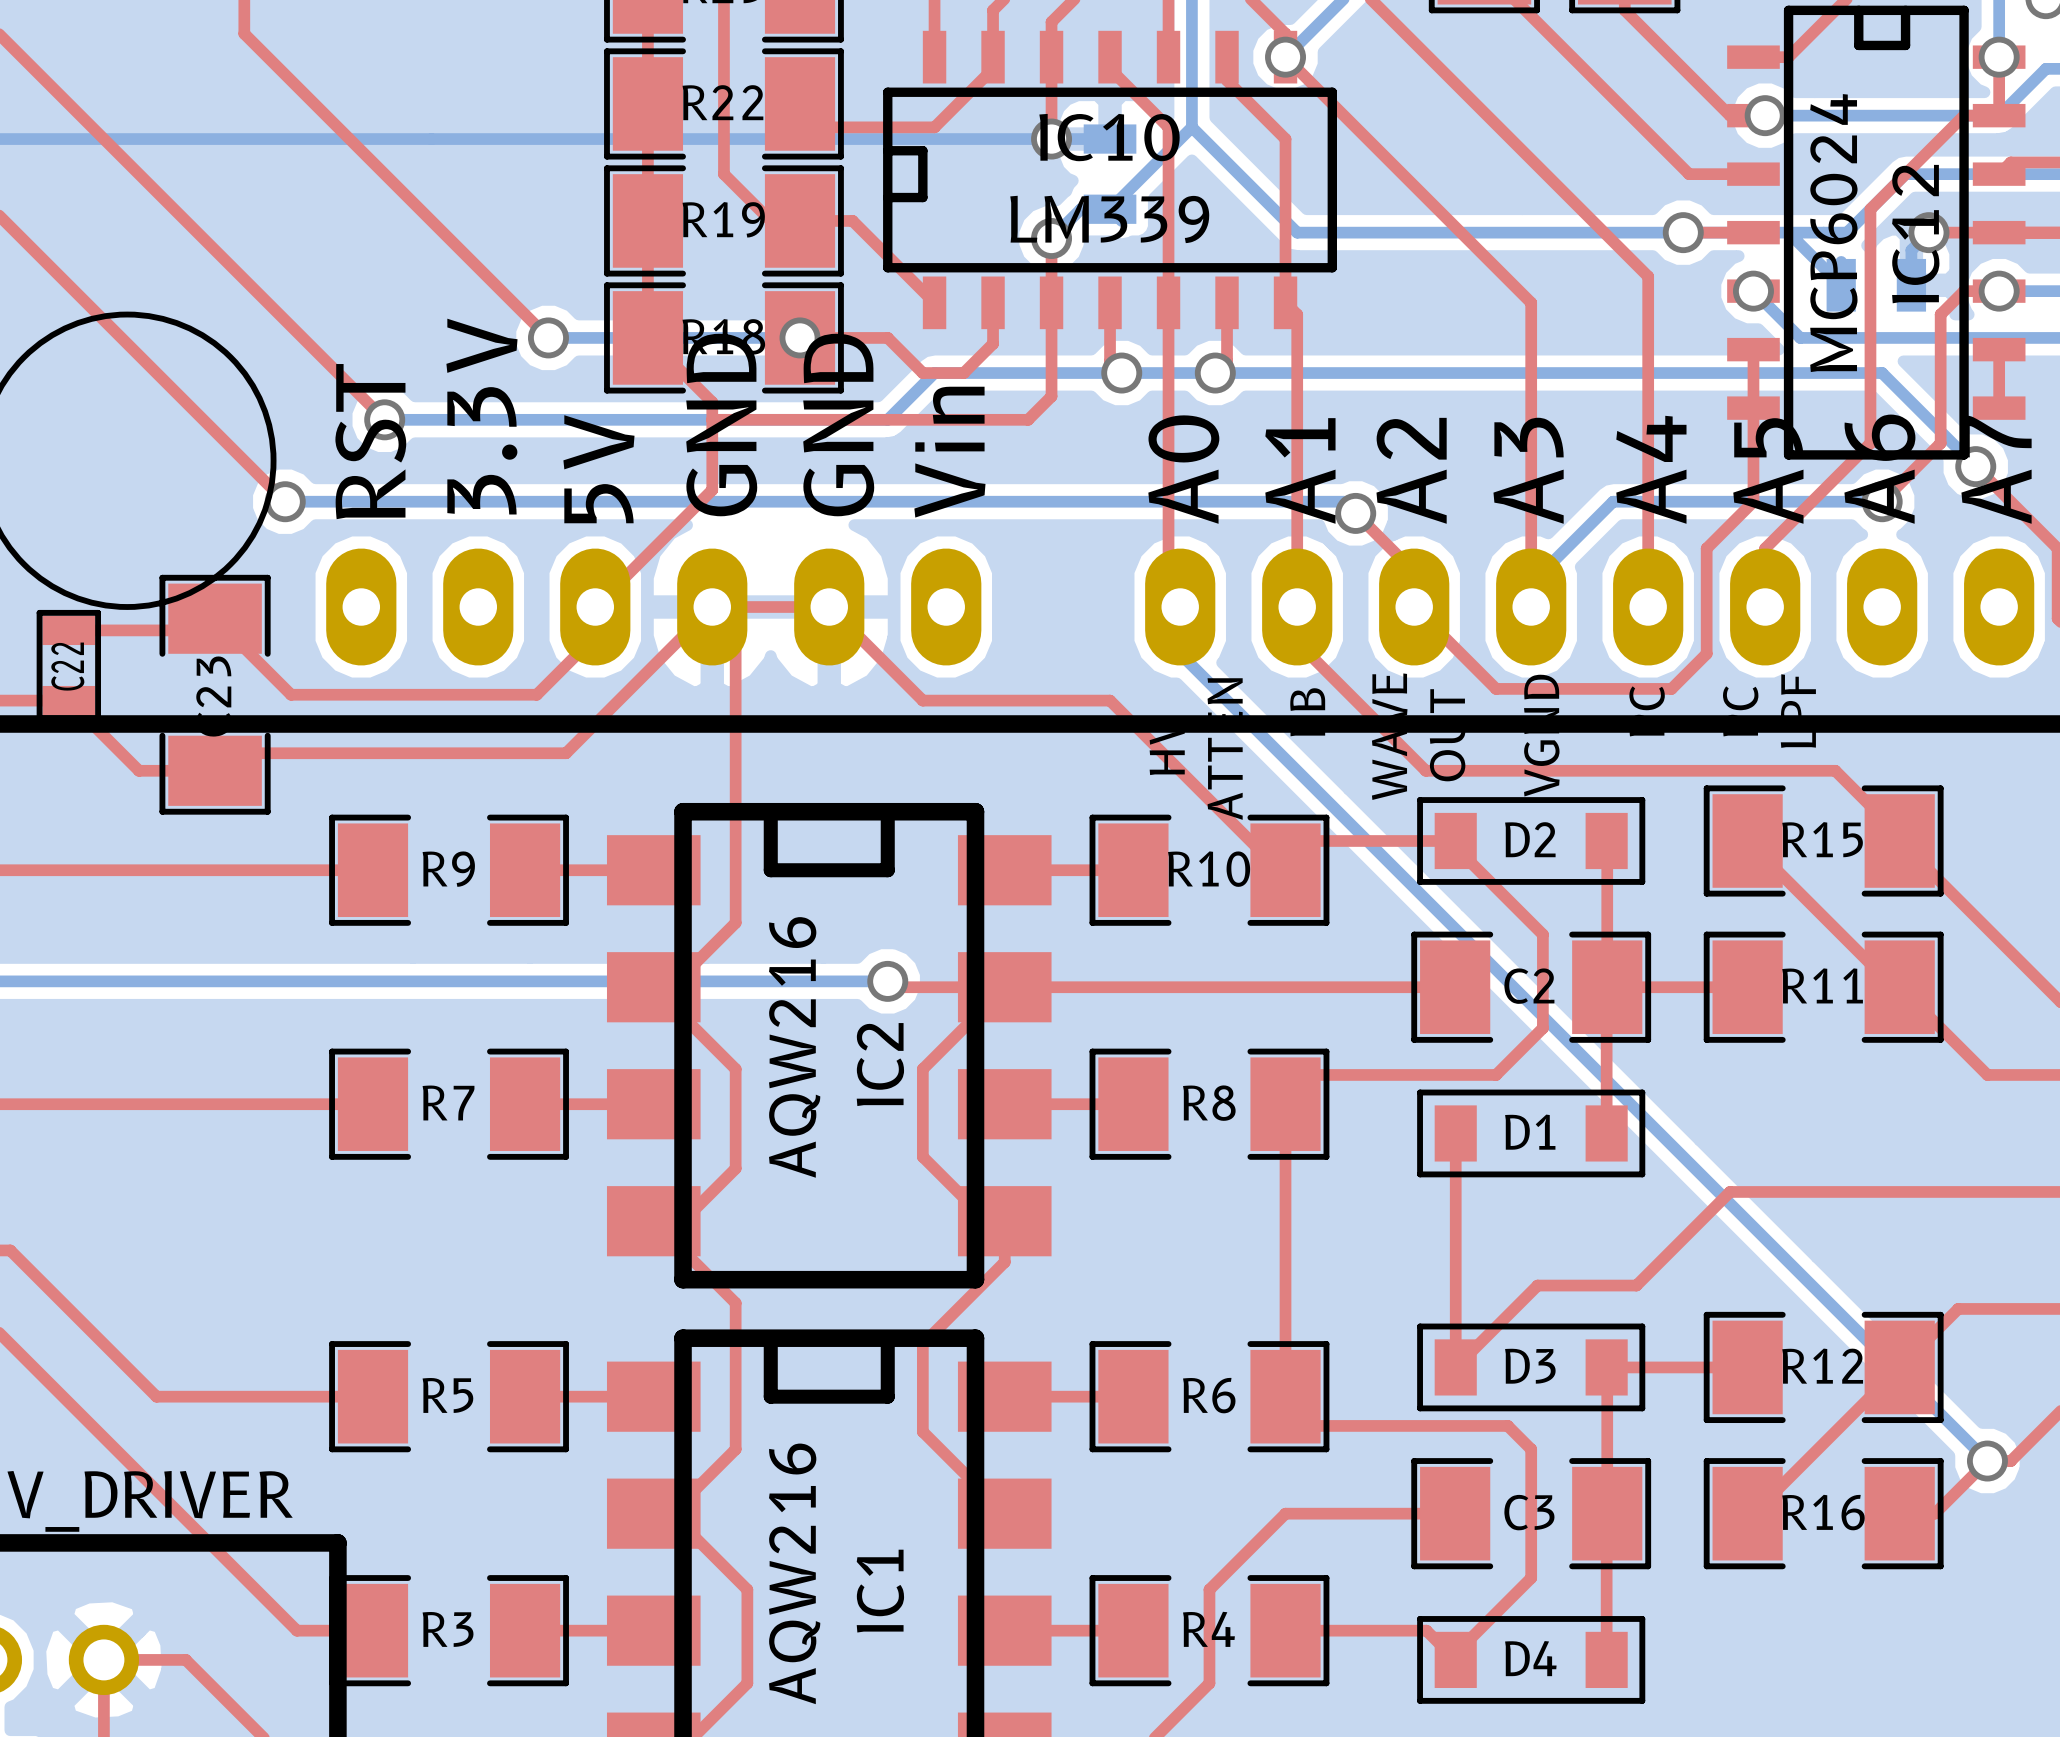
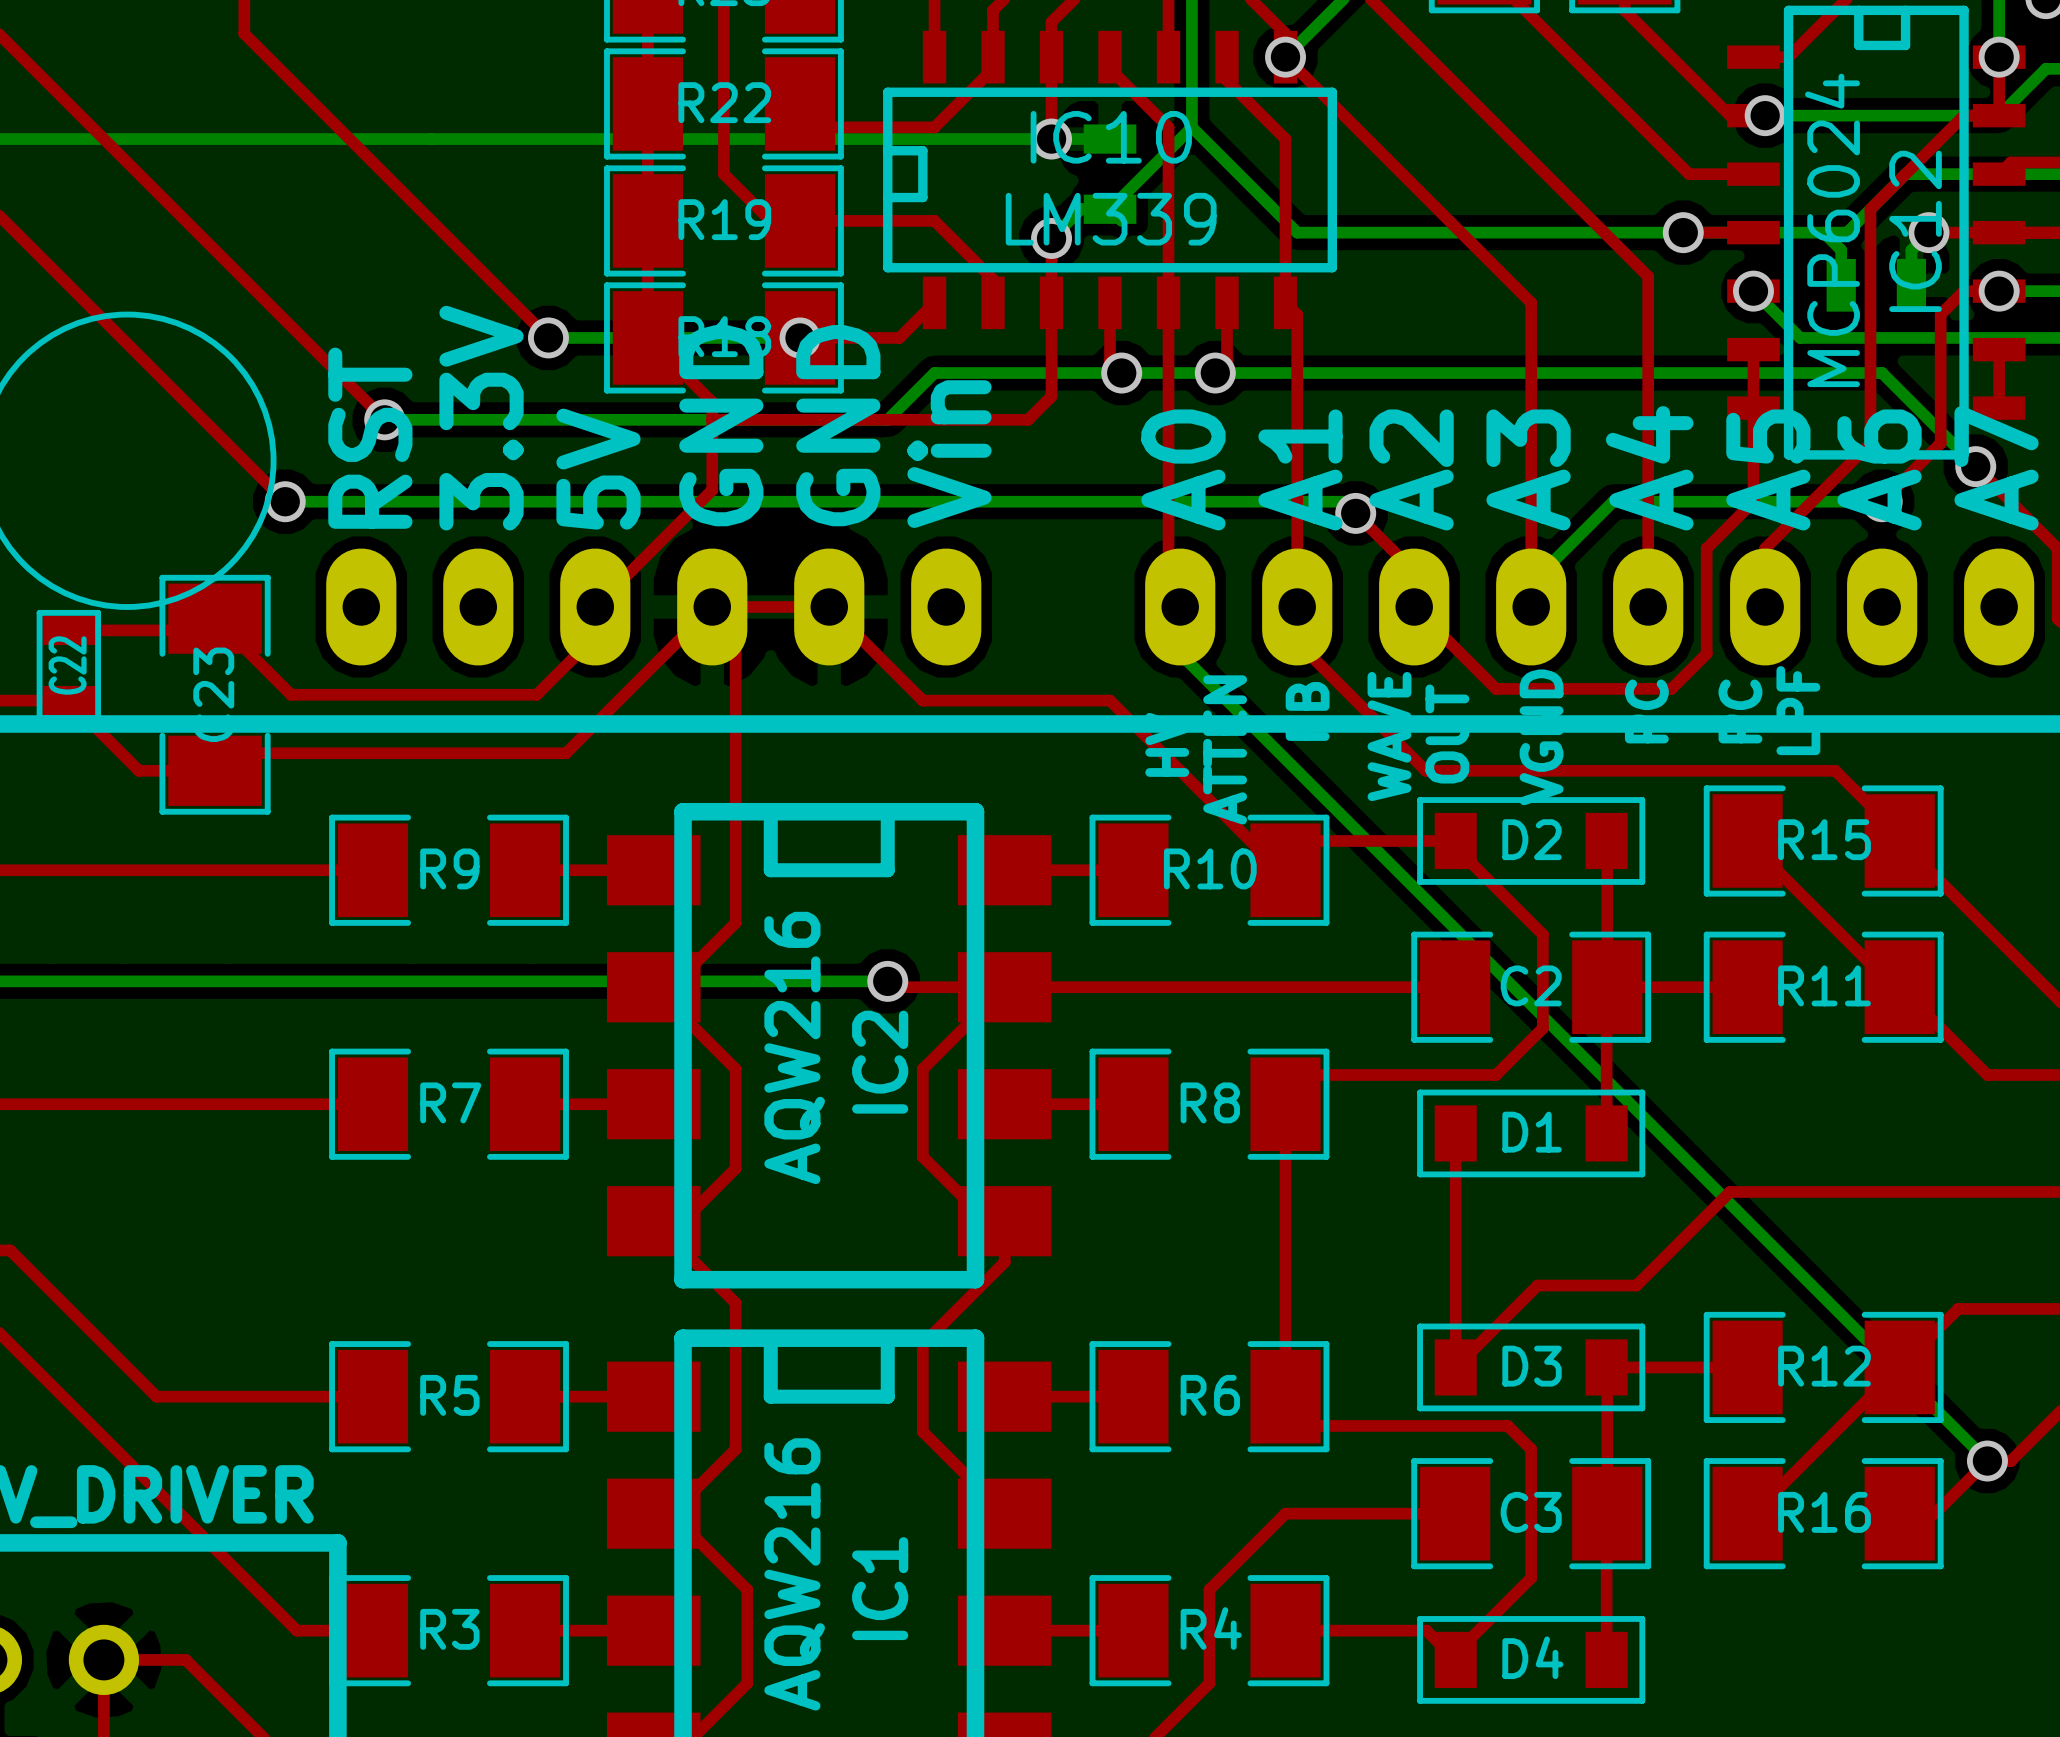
top track: (852, 220) (934, 302) -> (852, 220) (934, 220) (993, 279) (993, 302)
bottom track: (1788, 232) (1841, 285) -> none
bottom track: none -> (1823, 232) (1841, 250) (1841, 261)
top track: (993, 302) (993, 343) (963, 373) (922, 373) (887, 337) -> (934, 302) (899, 337) (887, 337)

